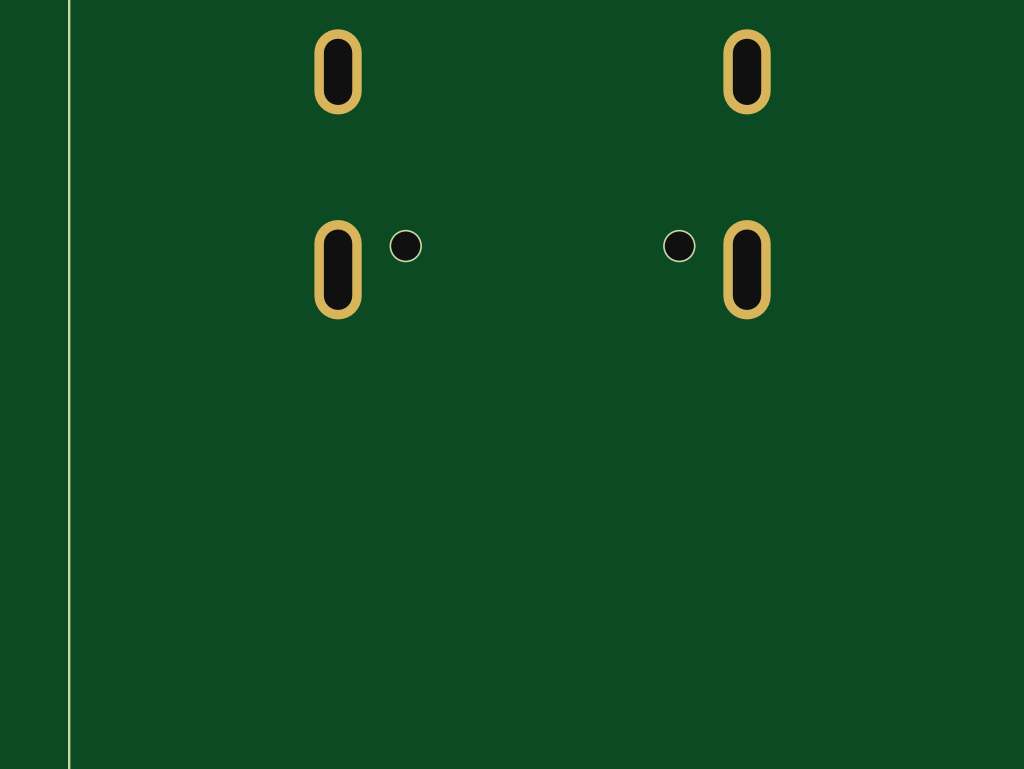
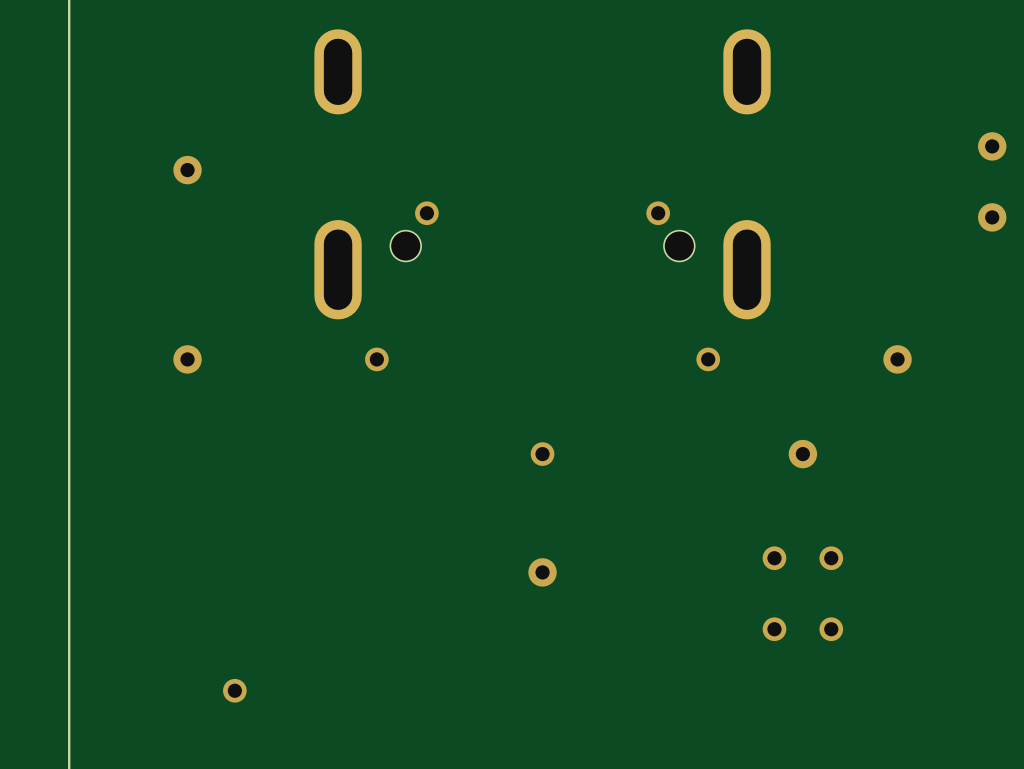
via: none -> (992, 146)
via: none -> (187, 170)
via: none -> (426, 213)
via: none -> (658, 213)
via: none -> (992, 217)
via: none -> (187, 359)
via: none -> (376, 359)
via: none -> (708, 359)
via: none -> (897, 359)
via: none -> (542, 454)
via: none -> (802, 454)
via: none -> (774, 558)
via: none -> (831, 558)
via: none -> (542, 572)
via: none -> (774, 629)
via: none -> (831, 629)
via: none -> (234, 690)

